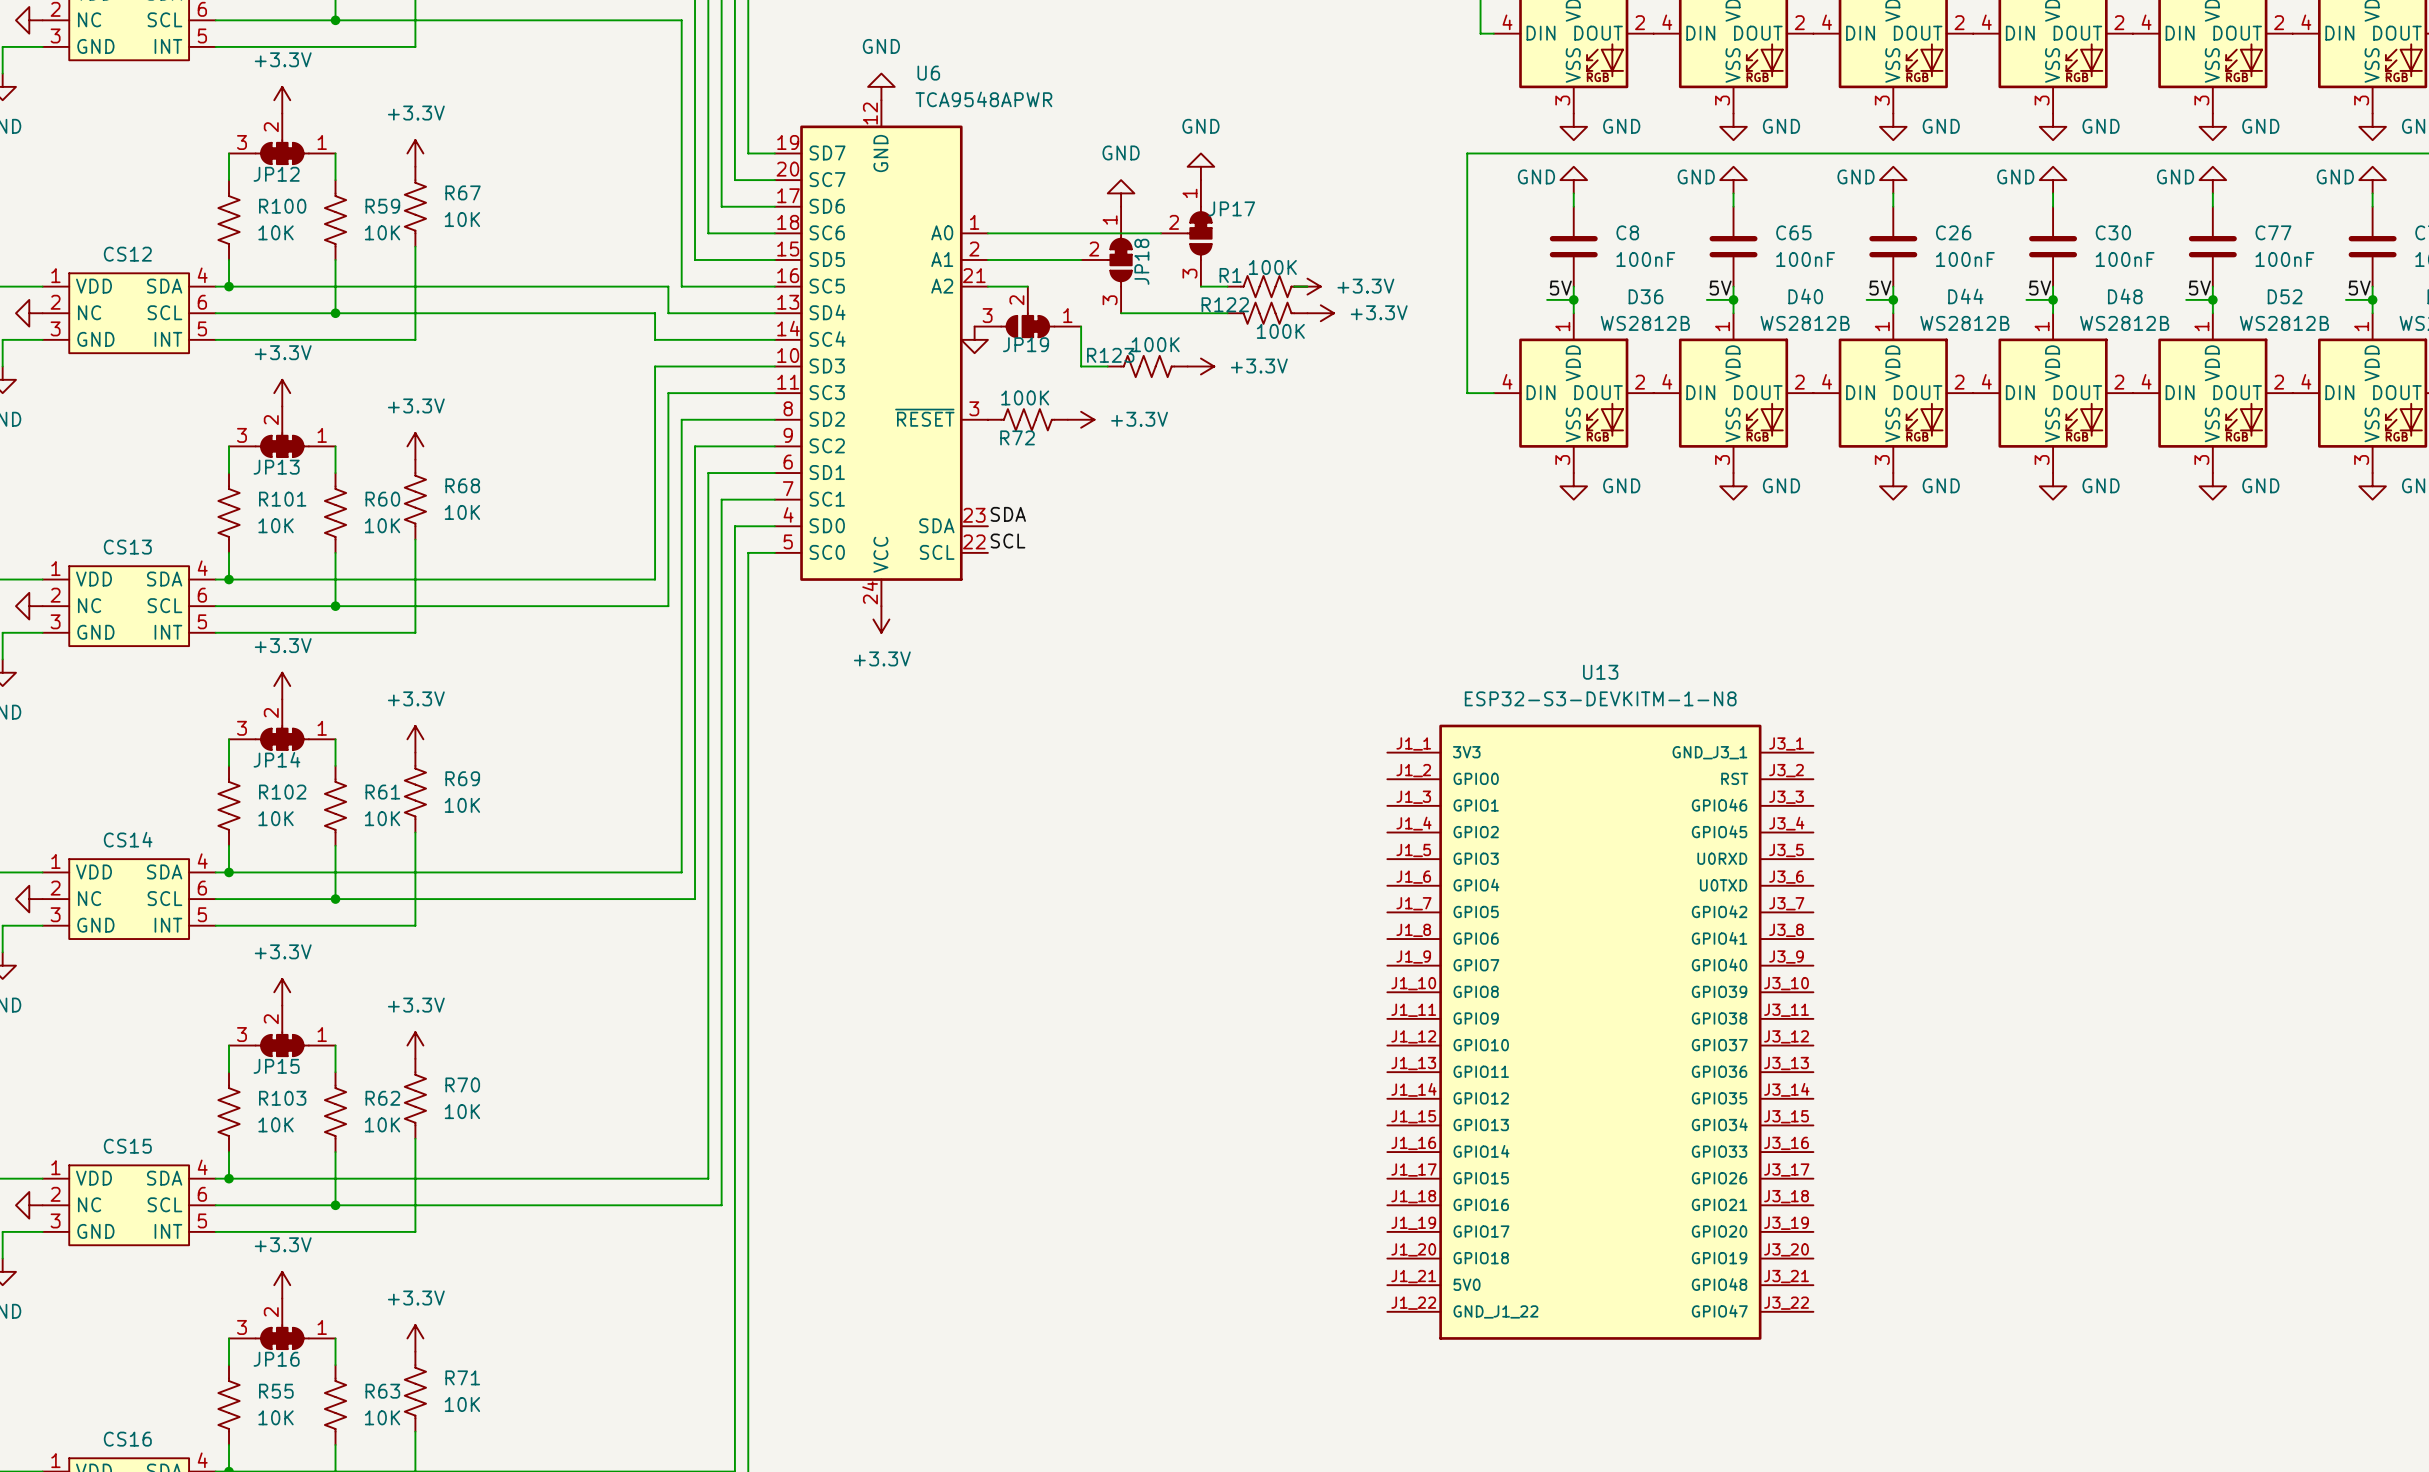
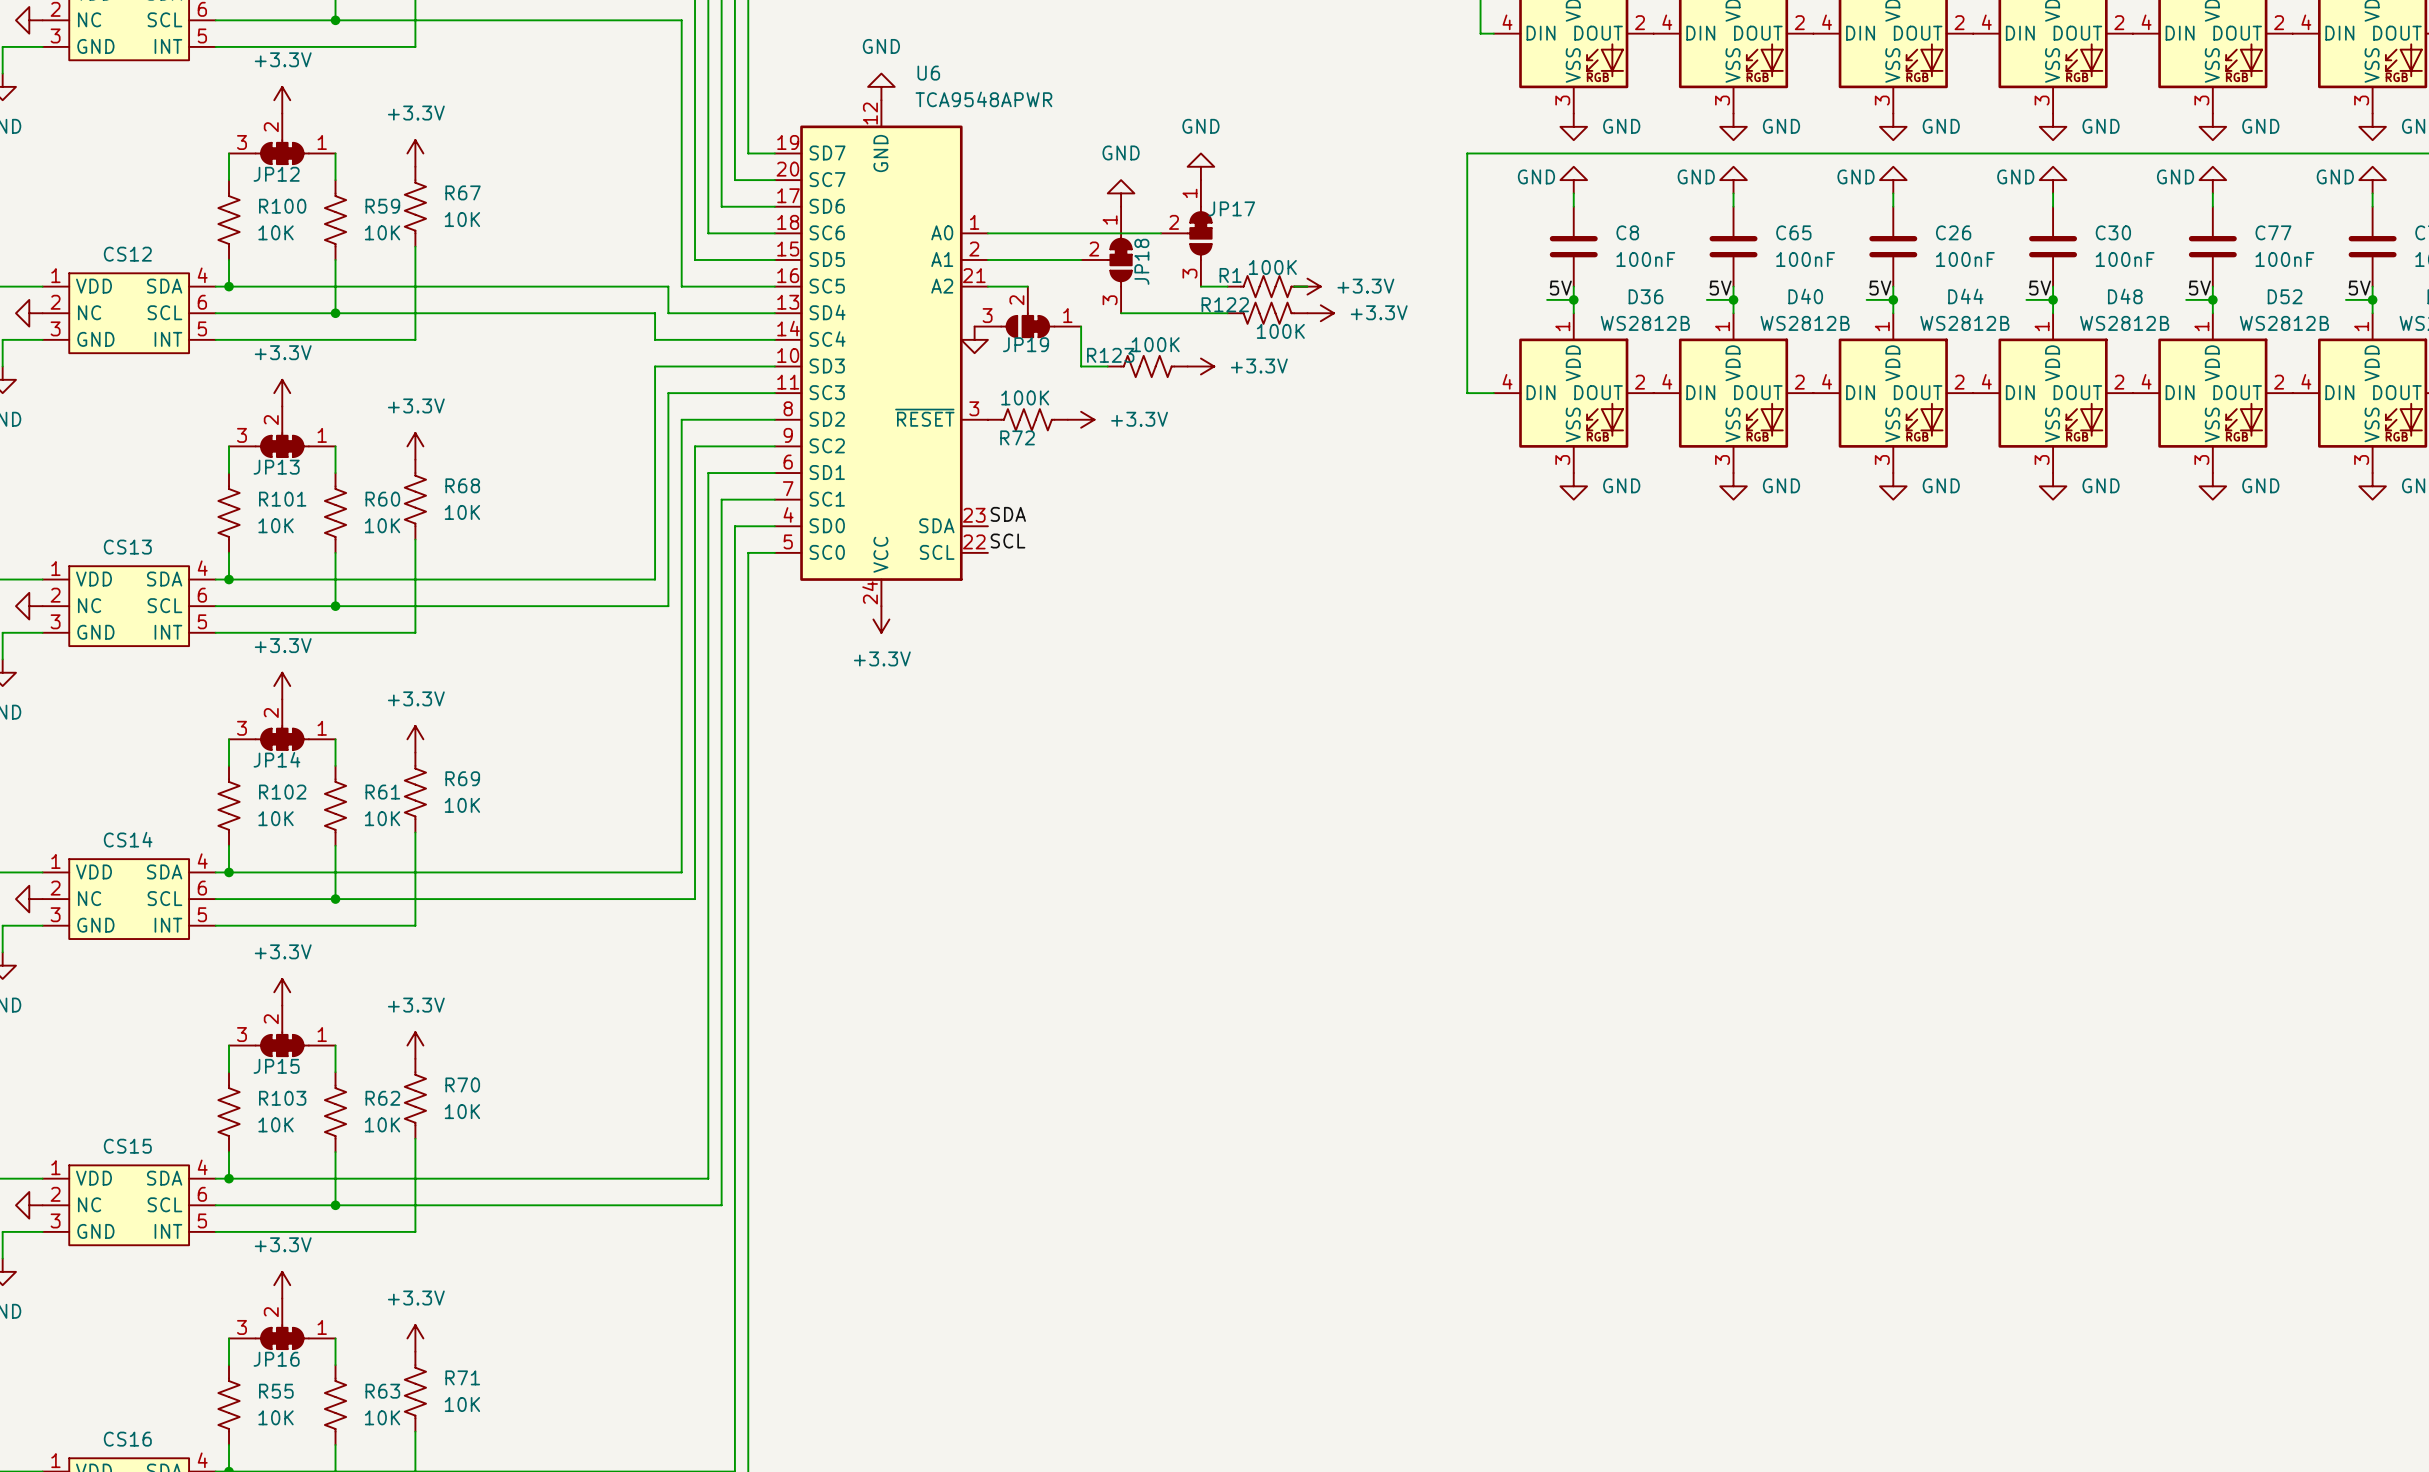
U13: ESP32-S3-DEVKITM-1-N8 (1600, 1032) -> none

